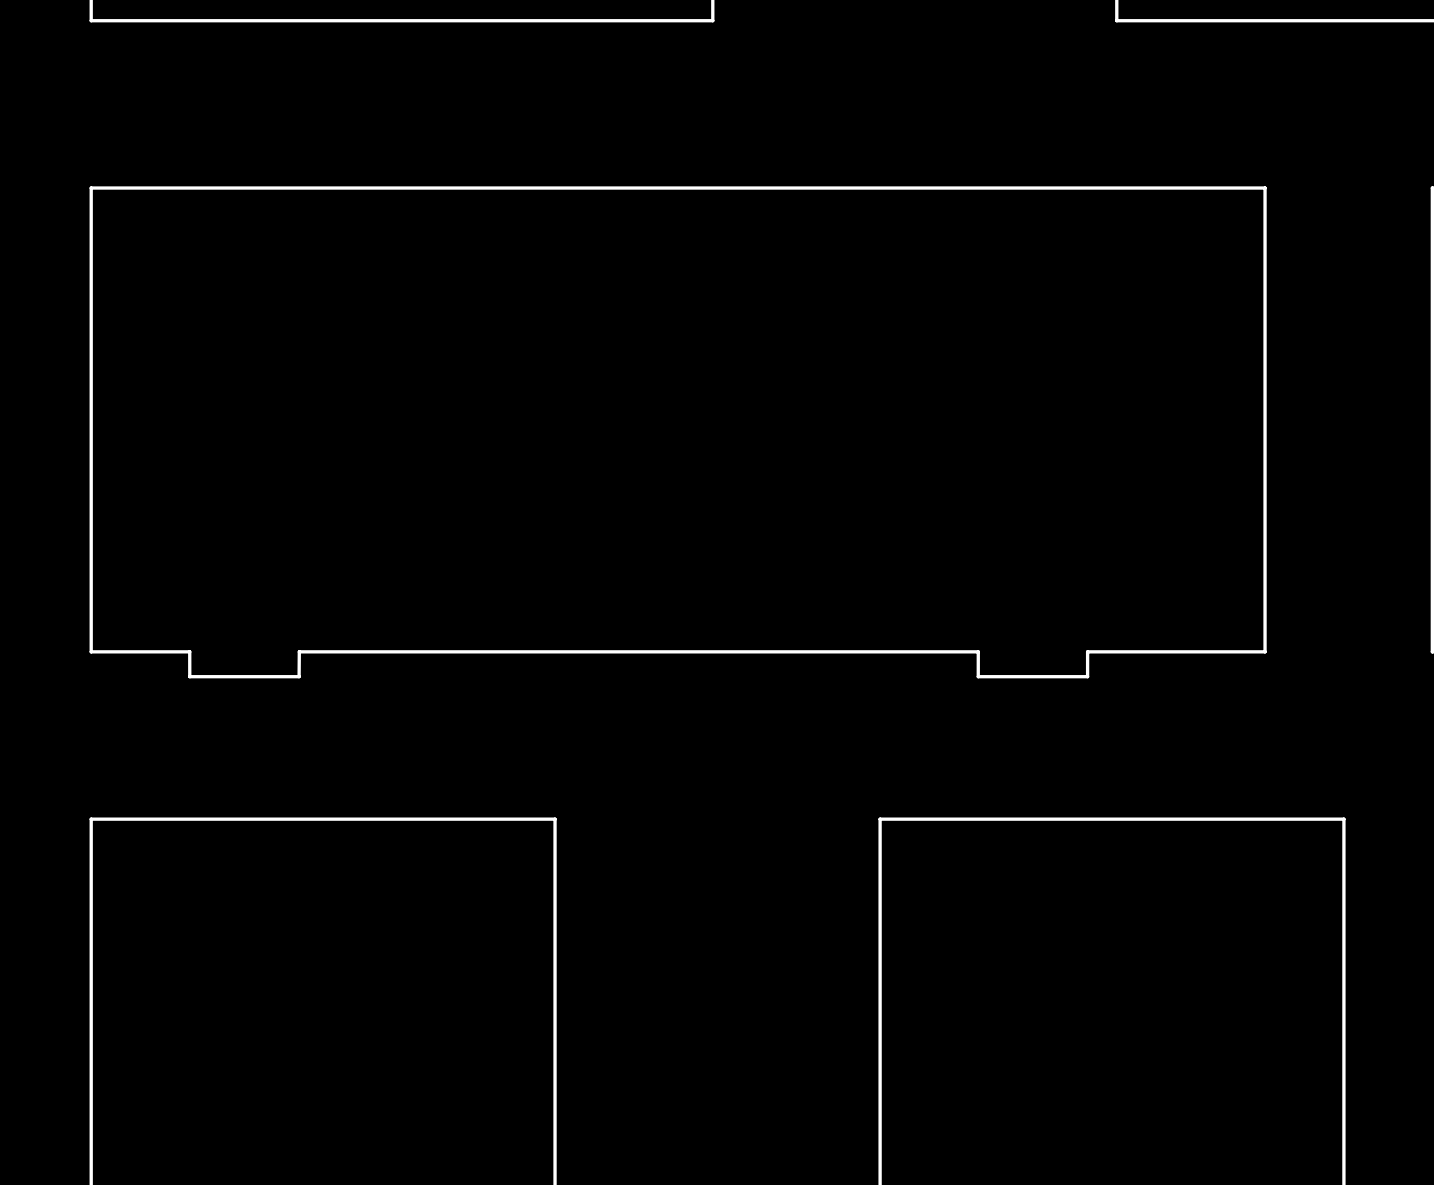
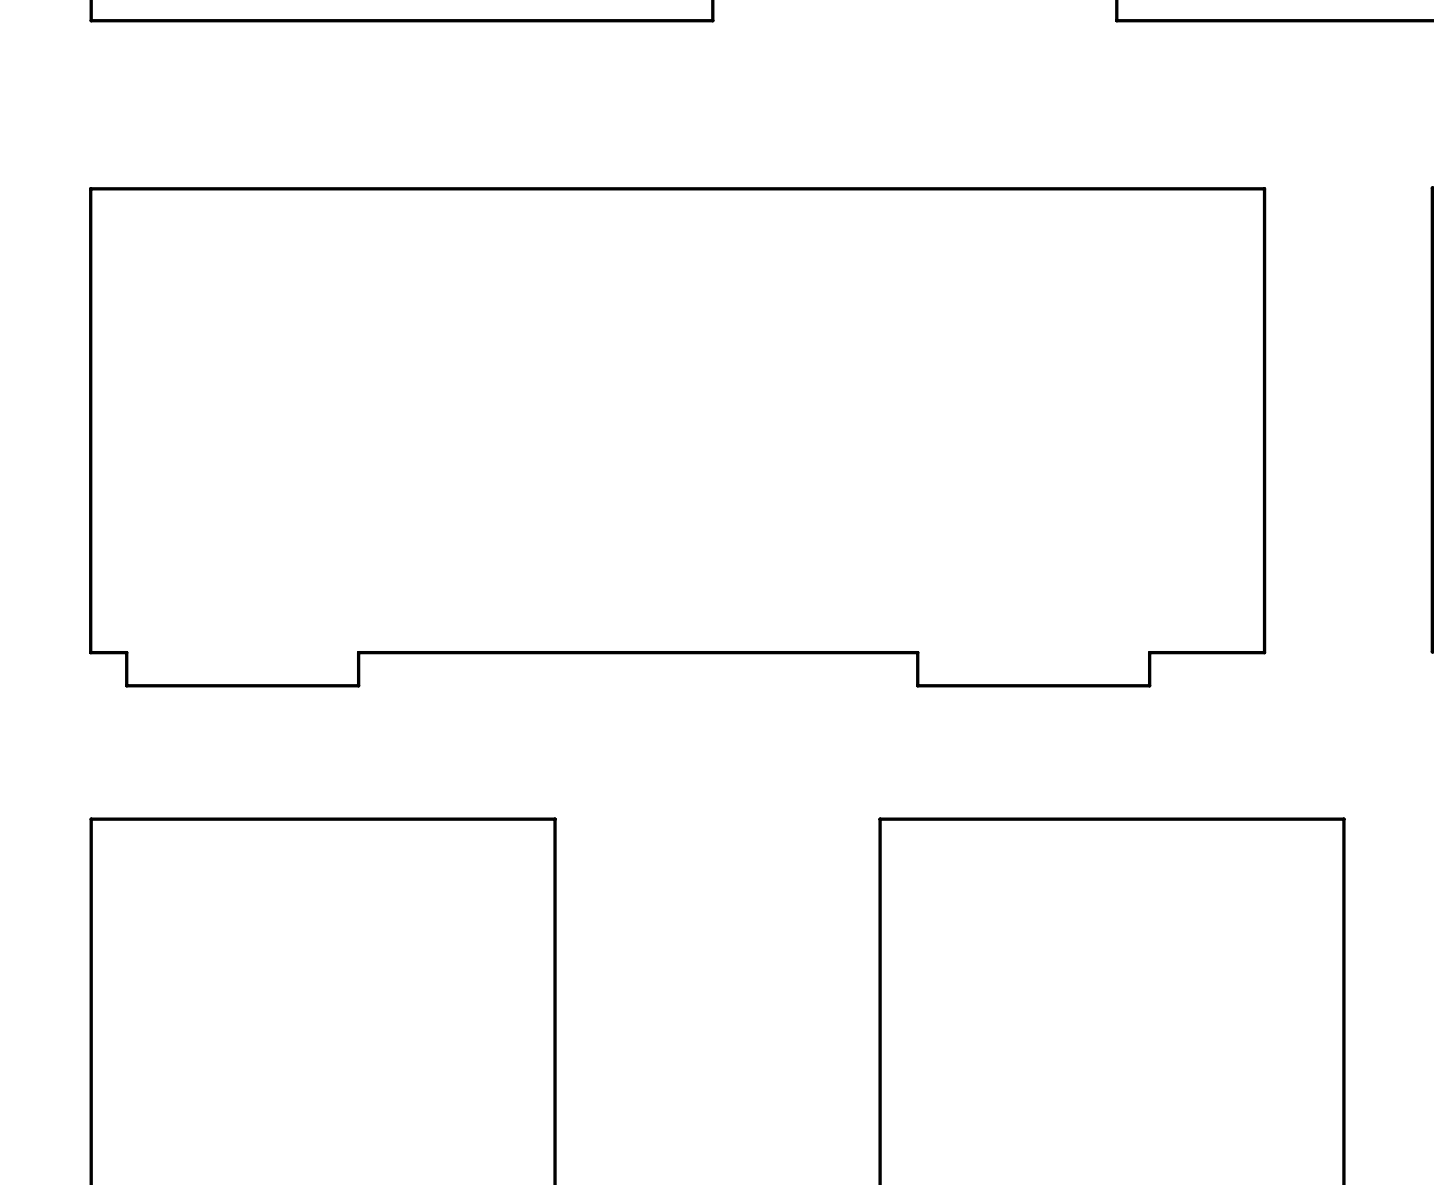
board edge: (91, 188) (91, 651) (189, 651) (189, 676) (299, 676) (299, 651) (978, 651) (978, 676) (1087, 676) (1087, 651) (1265, 651) (1265, 188) (91, 188) -> (90, 188) (90, 652) (126, 652) (126, 685) (358, 685) (358, 652) (917, 652) (917, 685) (1149, 685) (1149, 652) (1264, 652) (1264, 188) (90, 188)

